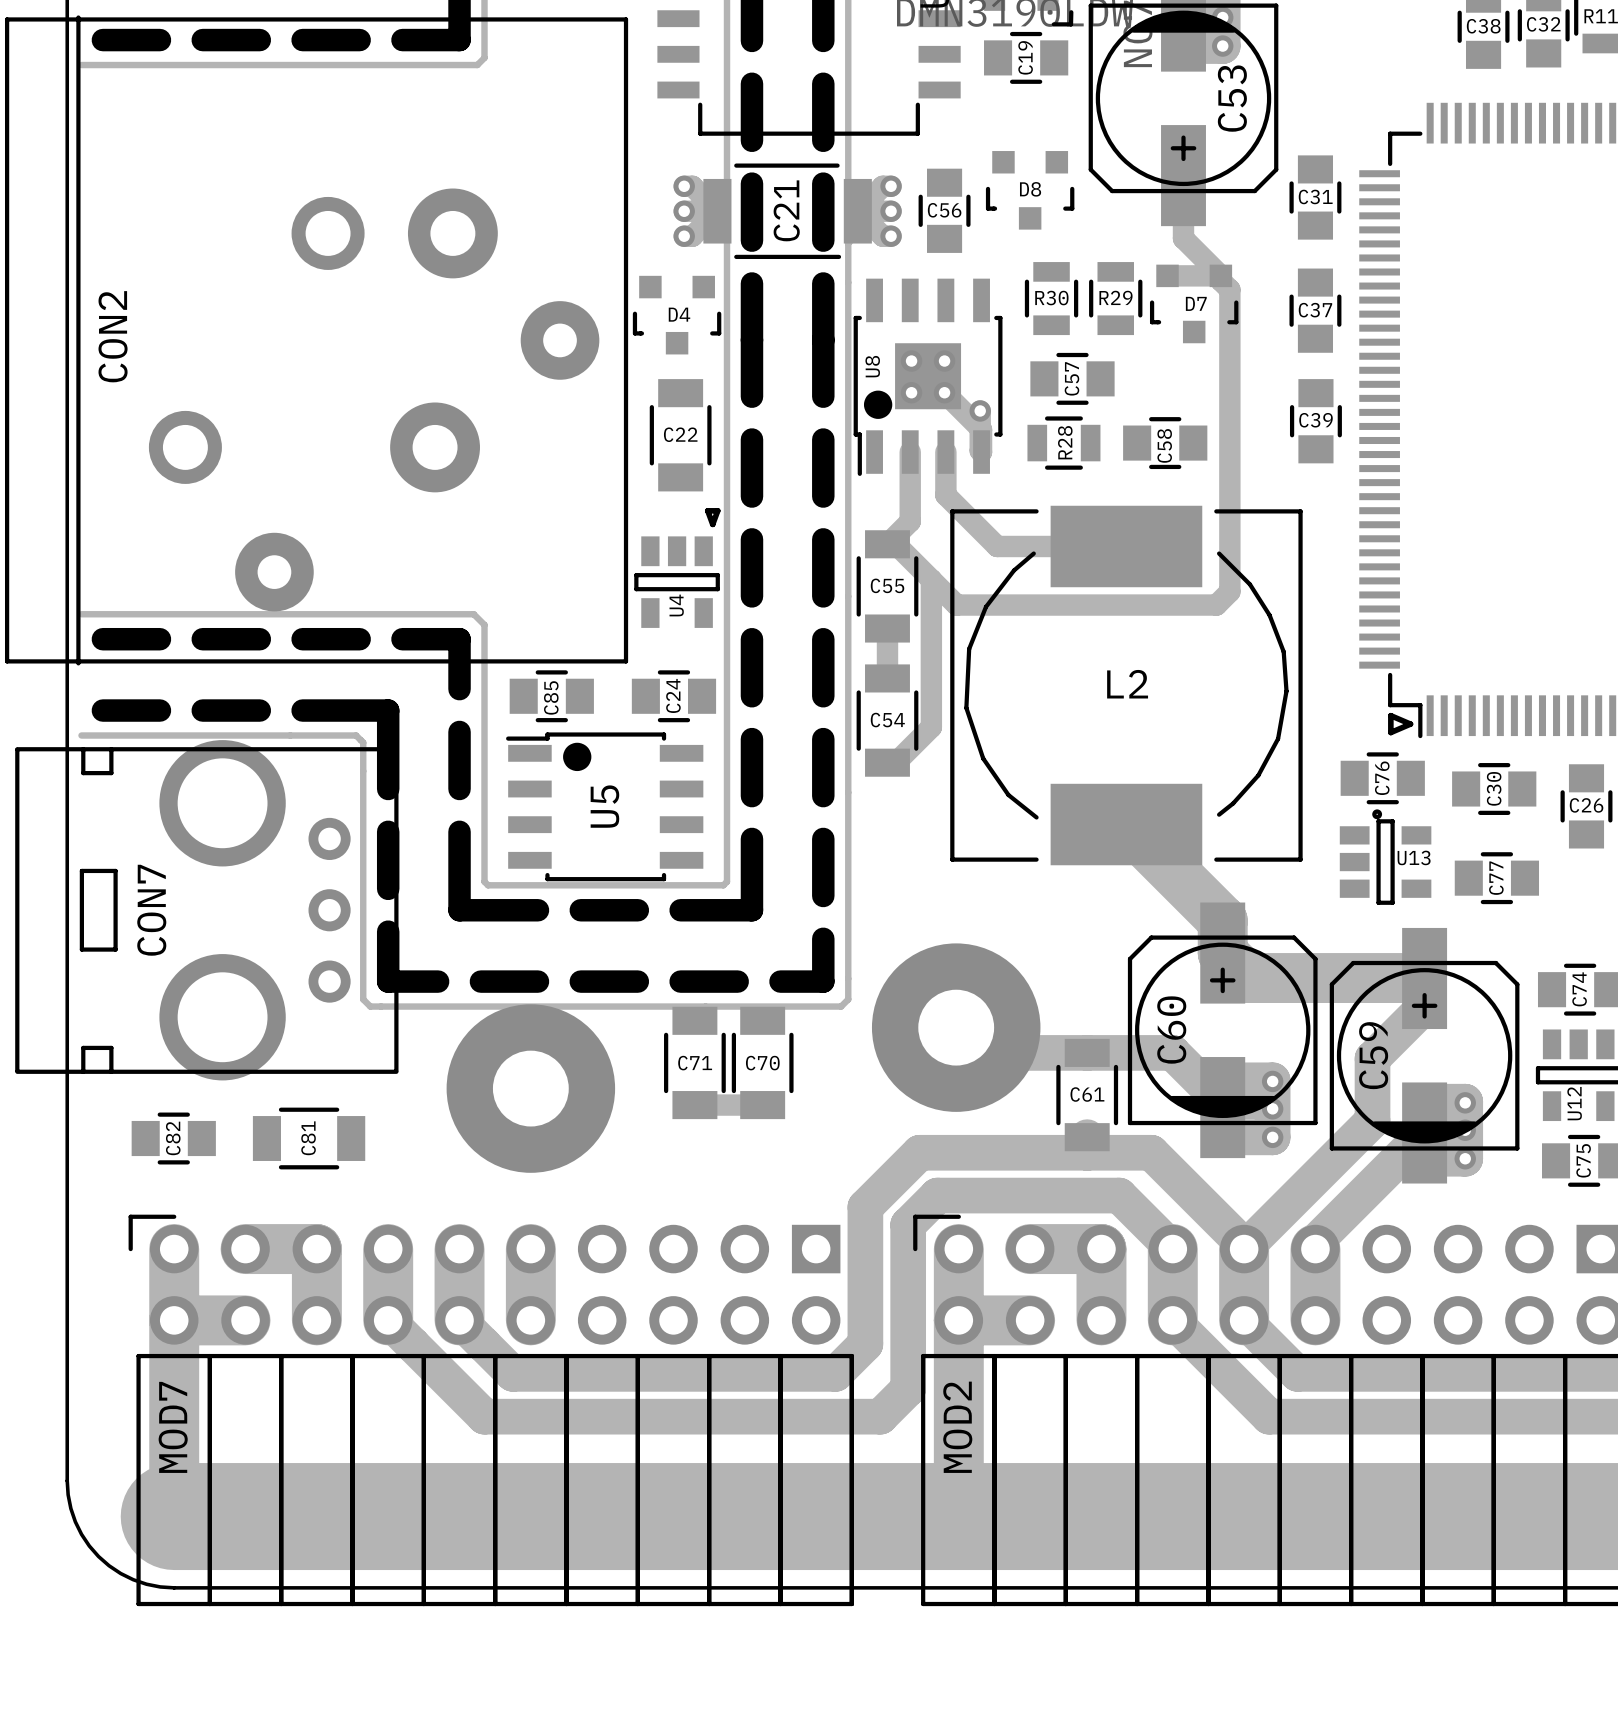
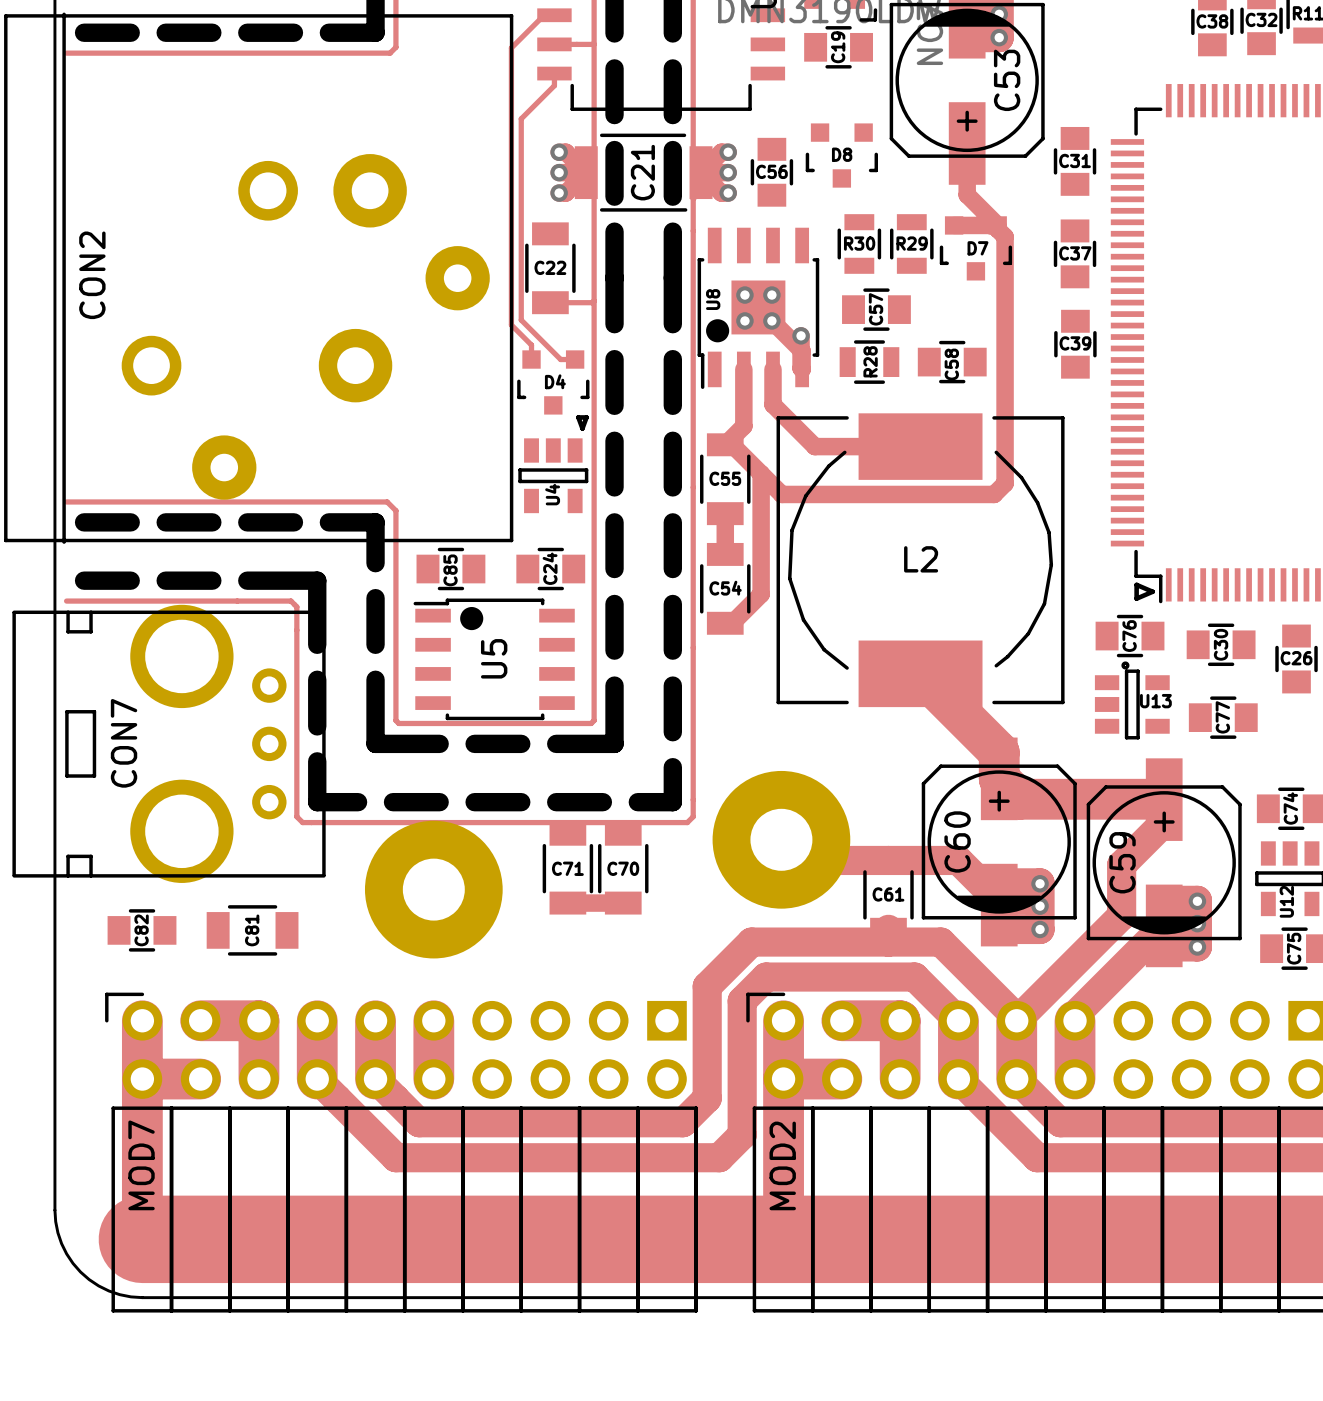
track: none -> (554, 15) (544, 15) (511, 47) (511, 324) (531, 345) (531, 359)
track: none -> (554, 44) (594, 44)
track: none -> (554, 73) (554, 85) (521, 118) (521, 320) (560, 359) (575, 359)
D4 position: (677, 315) -> (553, 382)
track: none -> (594, 300) (592, 302) (550, 302)
C22 position: (680, 435) -> (550, 268)

